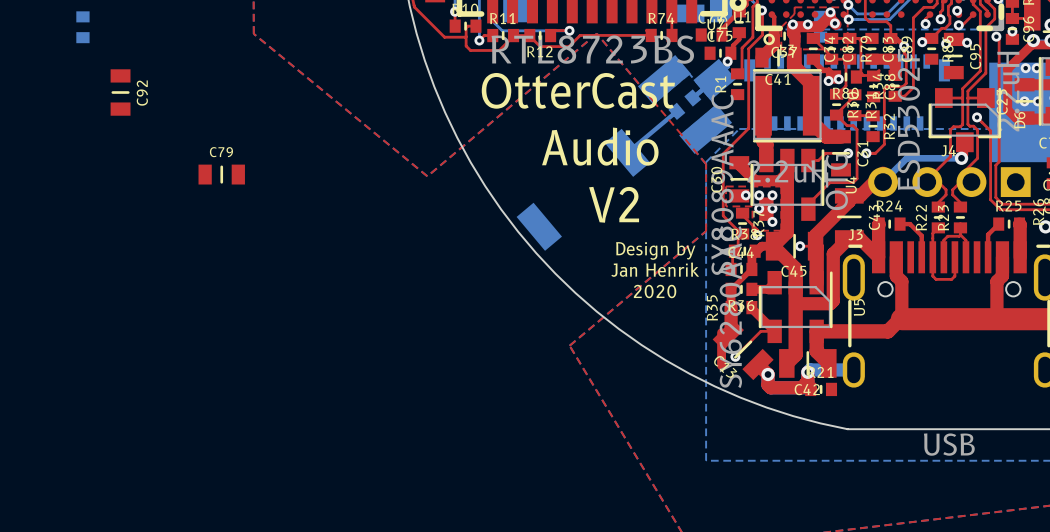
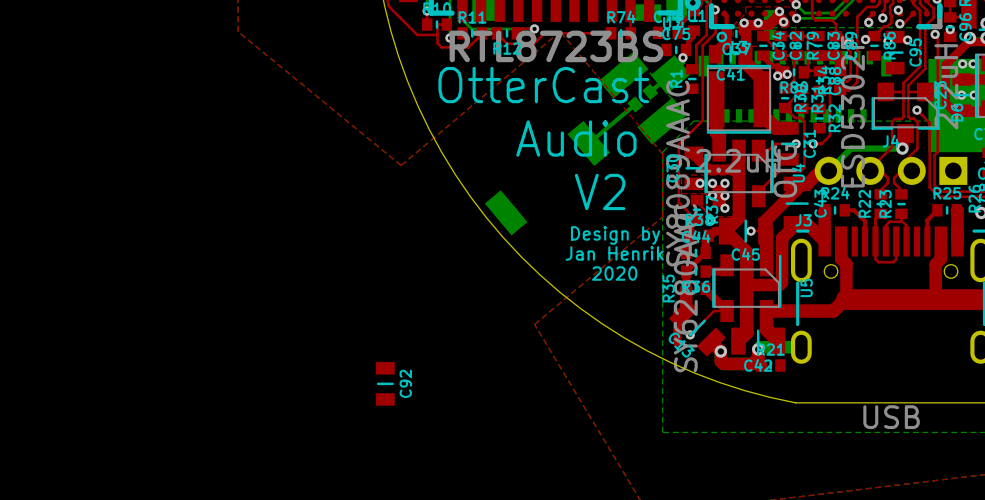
part: (82, 27) -> none
C92 position: (120, 92) -> (385, 383)
C79: (221, 174) -> none

